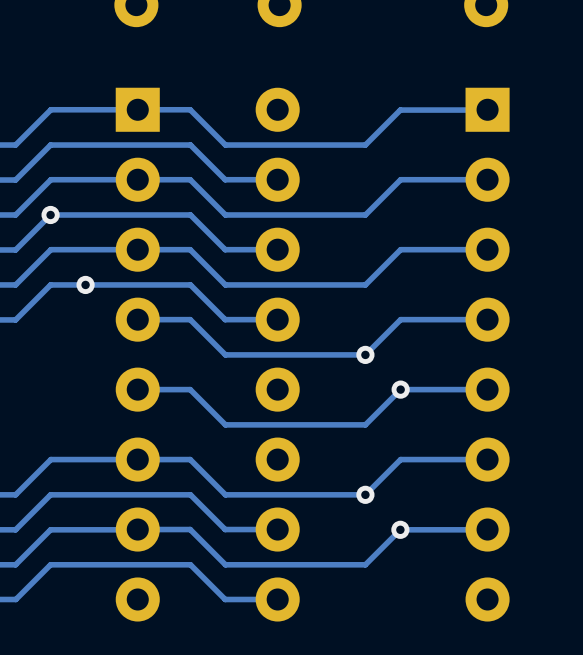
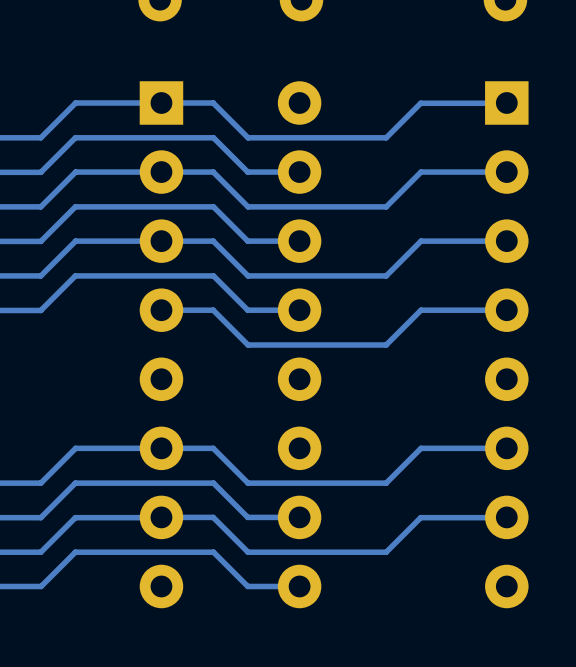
via: (50, 214) -> none
via: (85, 284) -> none
via: (365, 354) -> none
via: (400, 389) -> none
track: (487, 389) (400, 389) (365, 424) (225, 424) (190, 389) (137, 389) -> none
via: (365, 494) -> none
via: (400, 529) -> none

